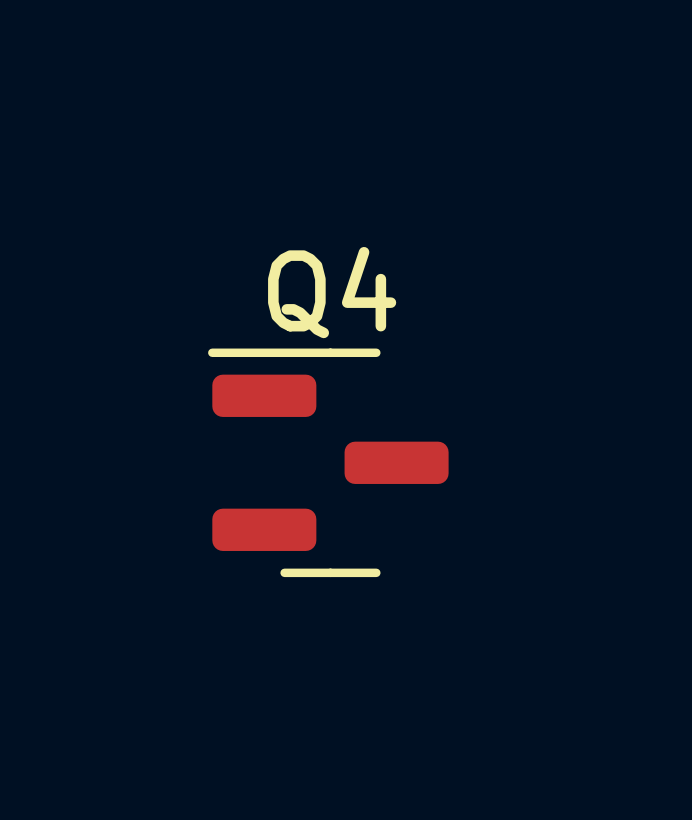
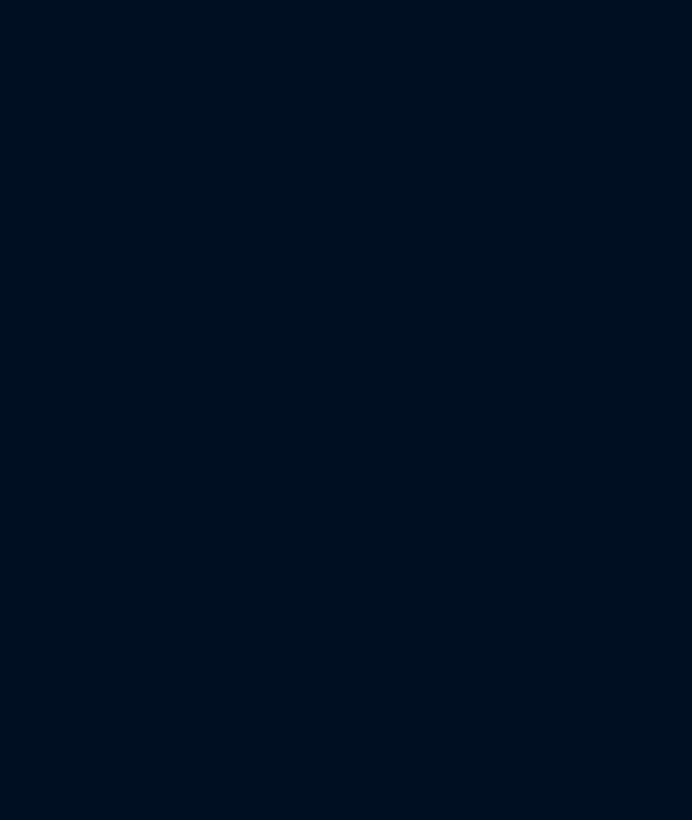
Q4: (328, 462) -> none

